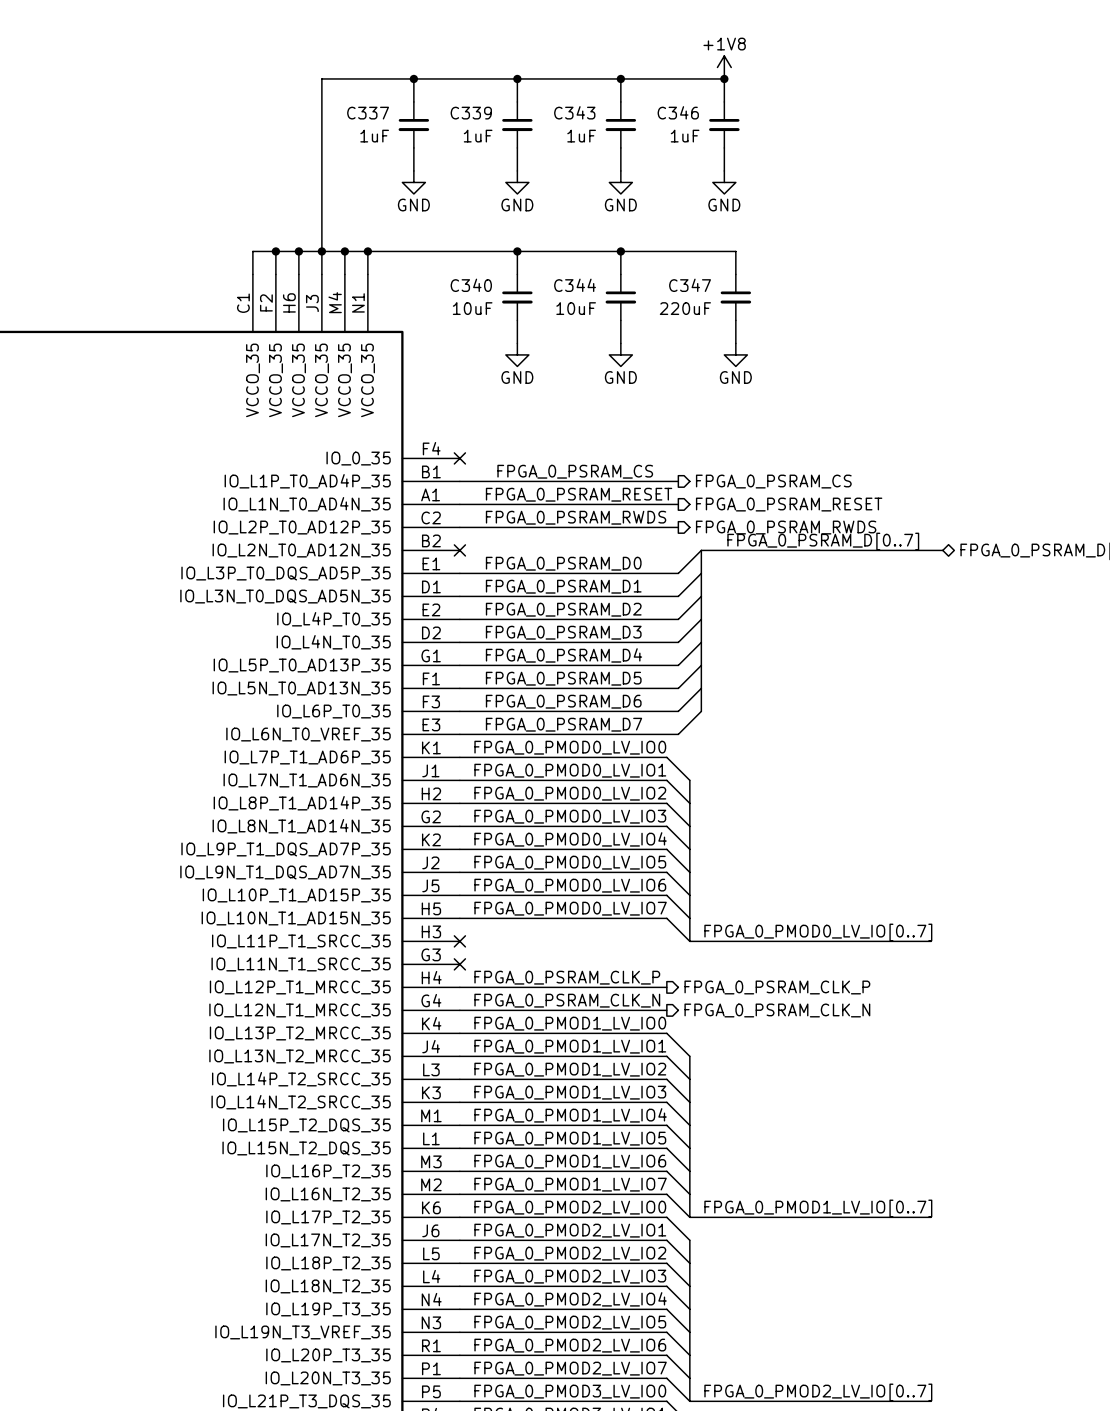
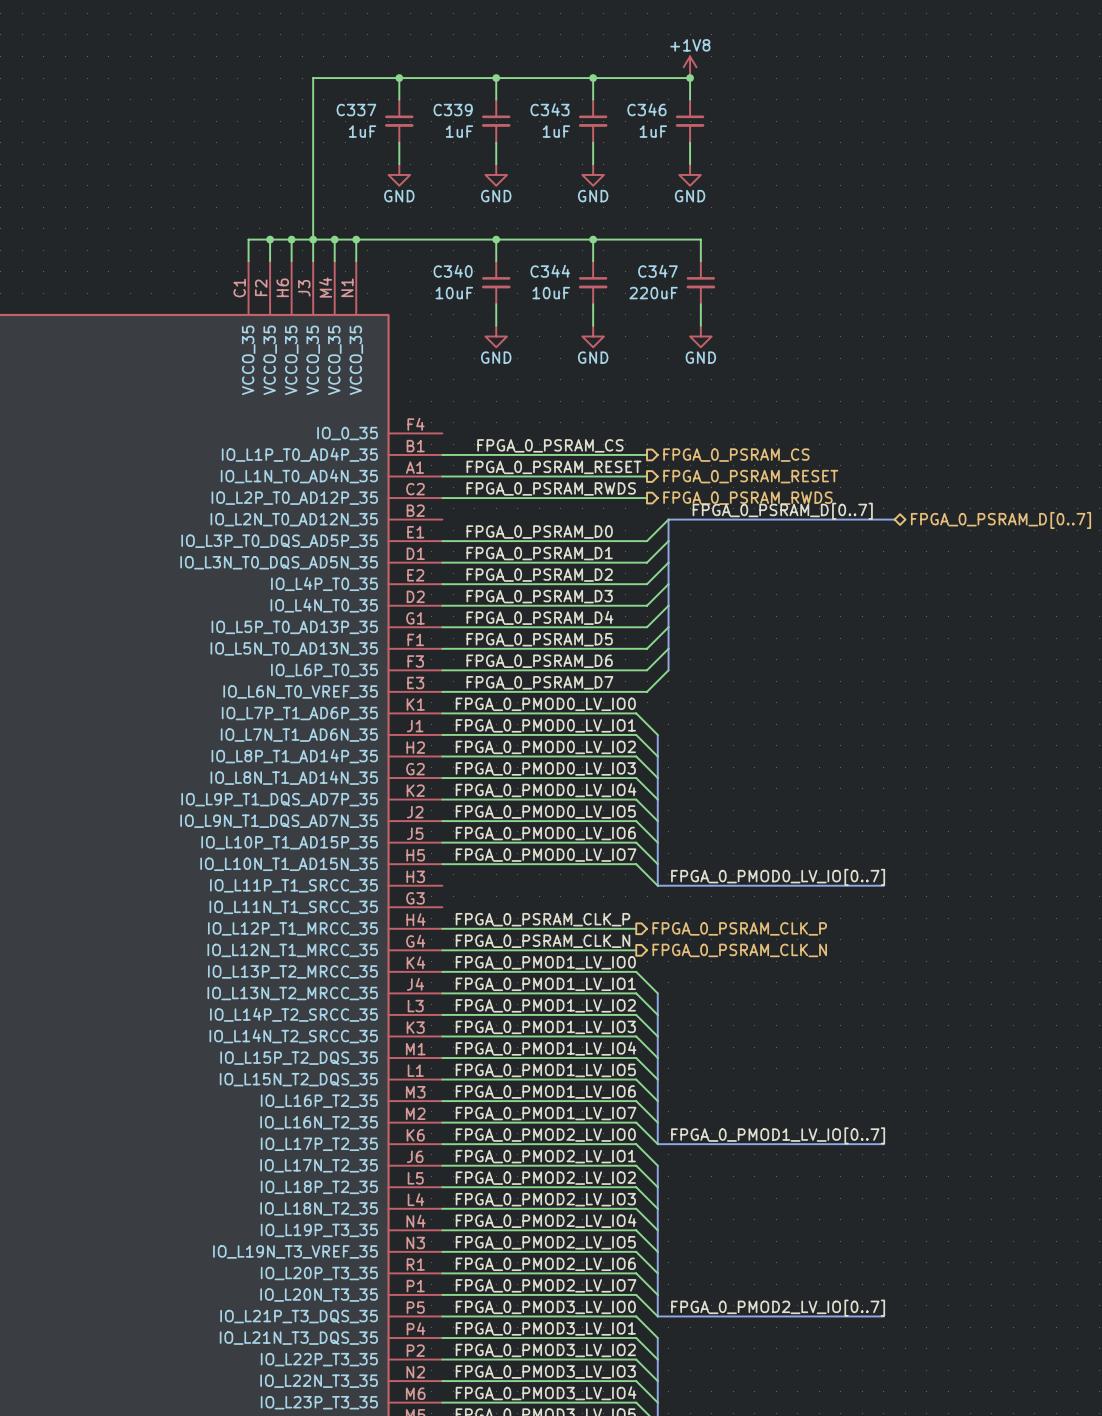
no-connect mark: (459, 458) -> none
no-connect mark: (459, 550) -> none
no-connect mark: (459, 941) -> none
no-connect mark: (459, 964) -> none

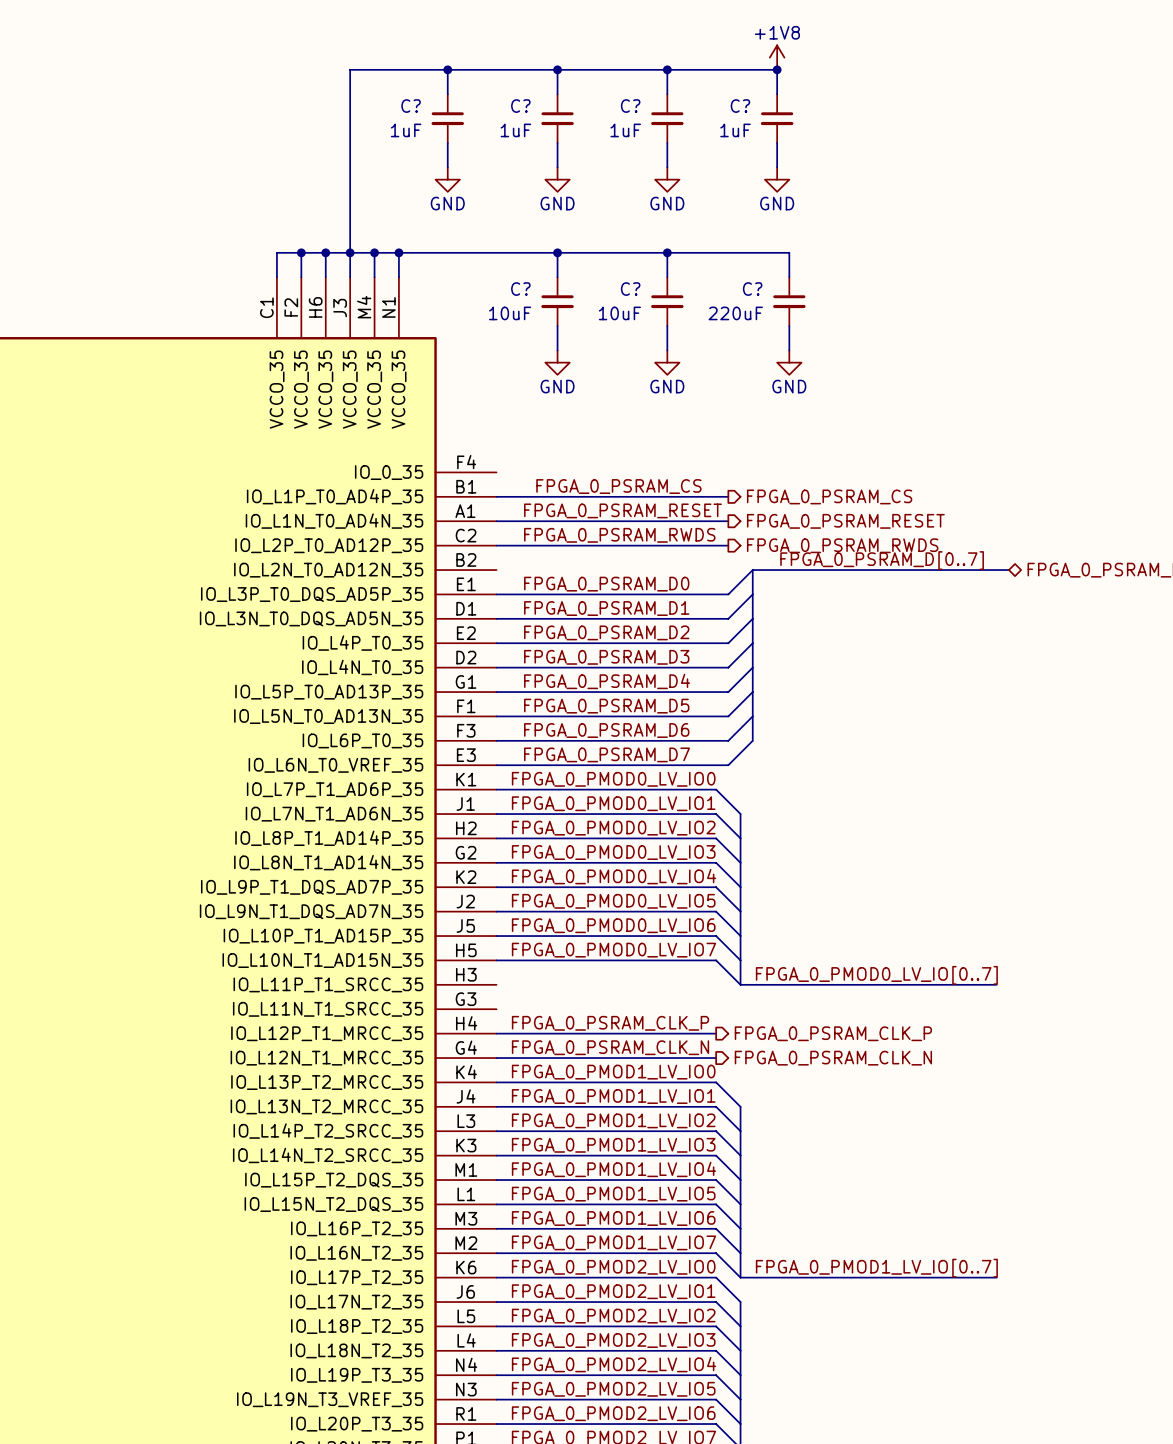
C343 name: C343 (550, 109) -> C? (630, 106)
C346 name: C346 (646, 109) -> C? (740, 106)
C337 name: C337 (356, 110) -> C? (411, 106)
C339 name: C339 (453, 110) -> C? (520, 106)
C340 name: C340 (453, 271) -> C? (520, 289)
C344 name: C344 (550, 271) -> C? (630, 289)
C347 name: C347 (657, 271) -> C? (752, 289)

